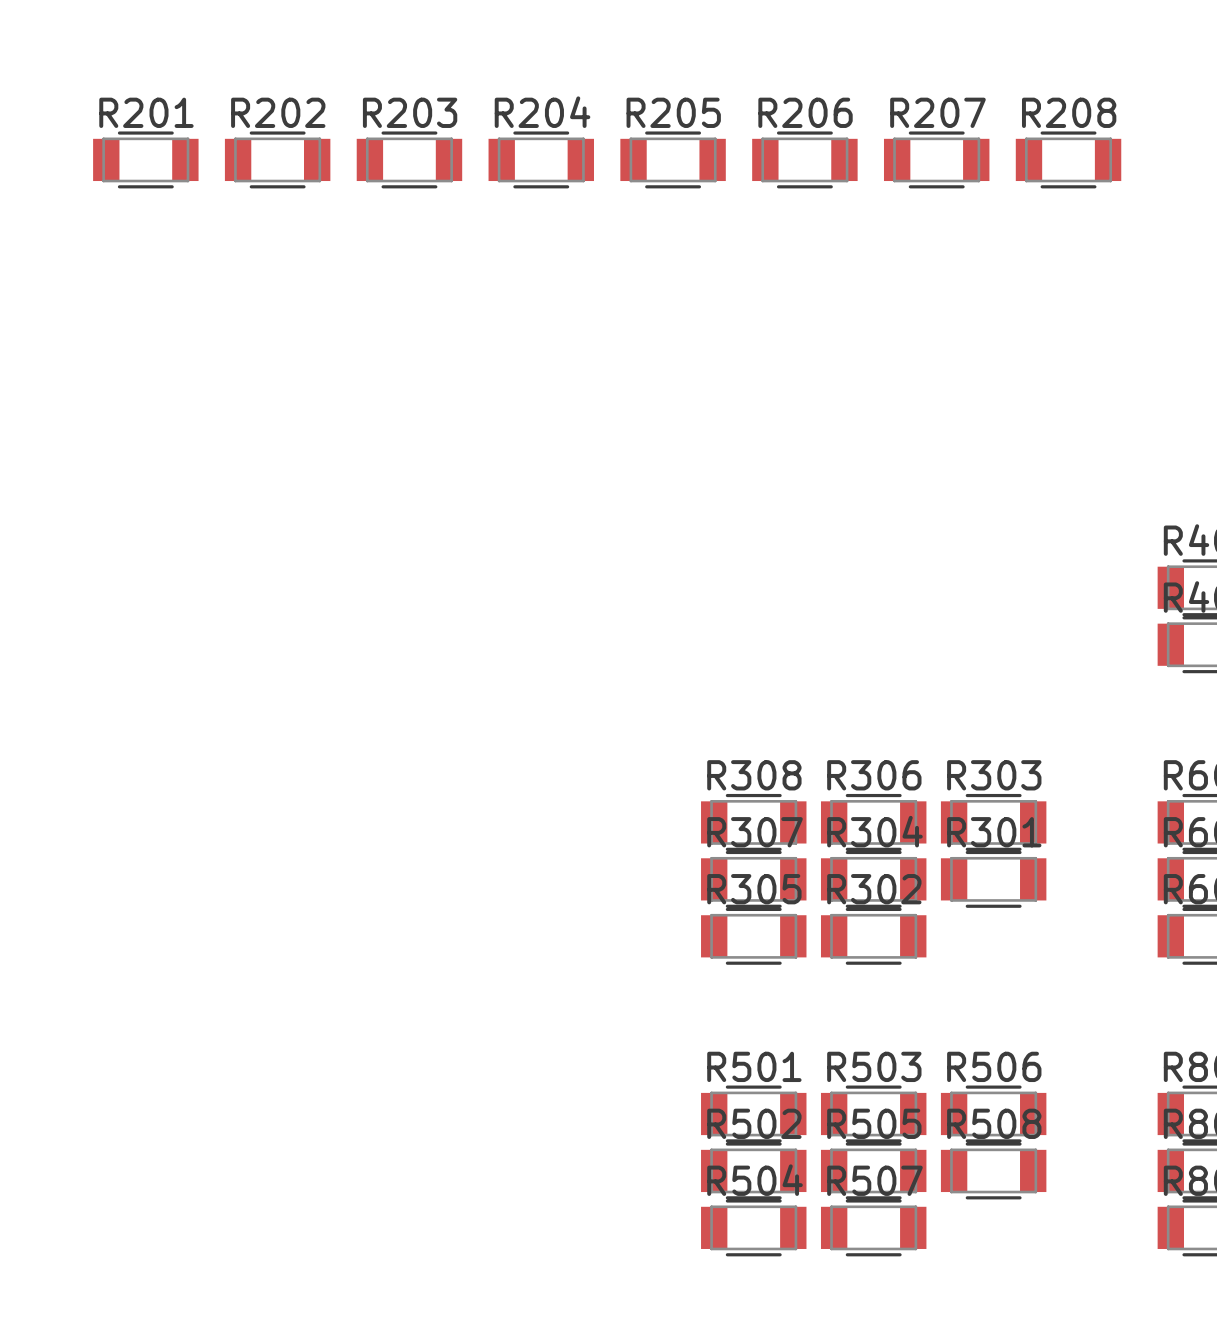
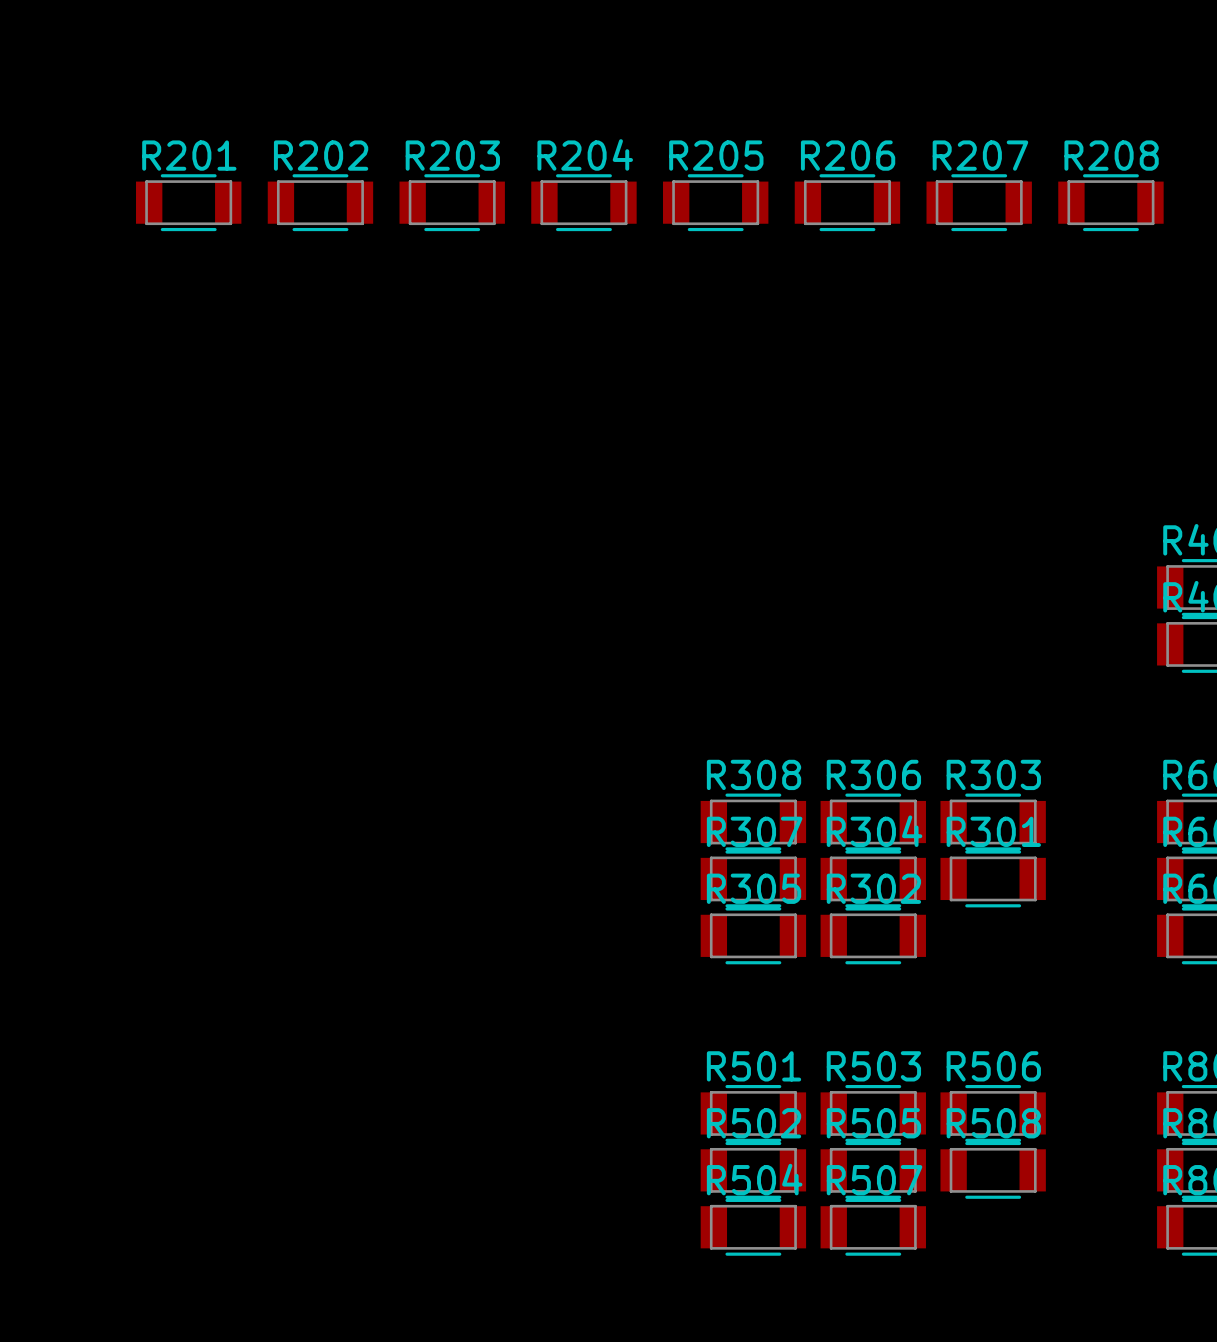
R201 position: (145, 159) -> (188, 202)
R202 position: (277, 159) -> (320, 202)
R203 position: (409, 159) -> (452, 202)
R204 position: (541, 159) -> (583, 202)
R205 position: (673, 159) -> (715, 202)
R206 position: (804, 159) -> (847, 202)
R207 position: (936, 159) -> (979, 202)
R208 position: (1068, 159) -> (1110, 202)

